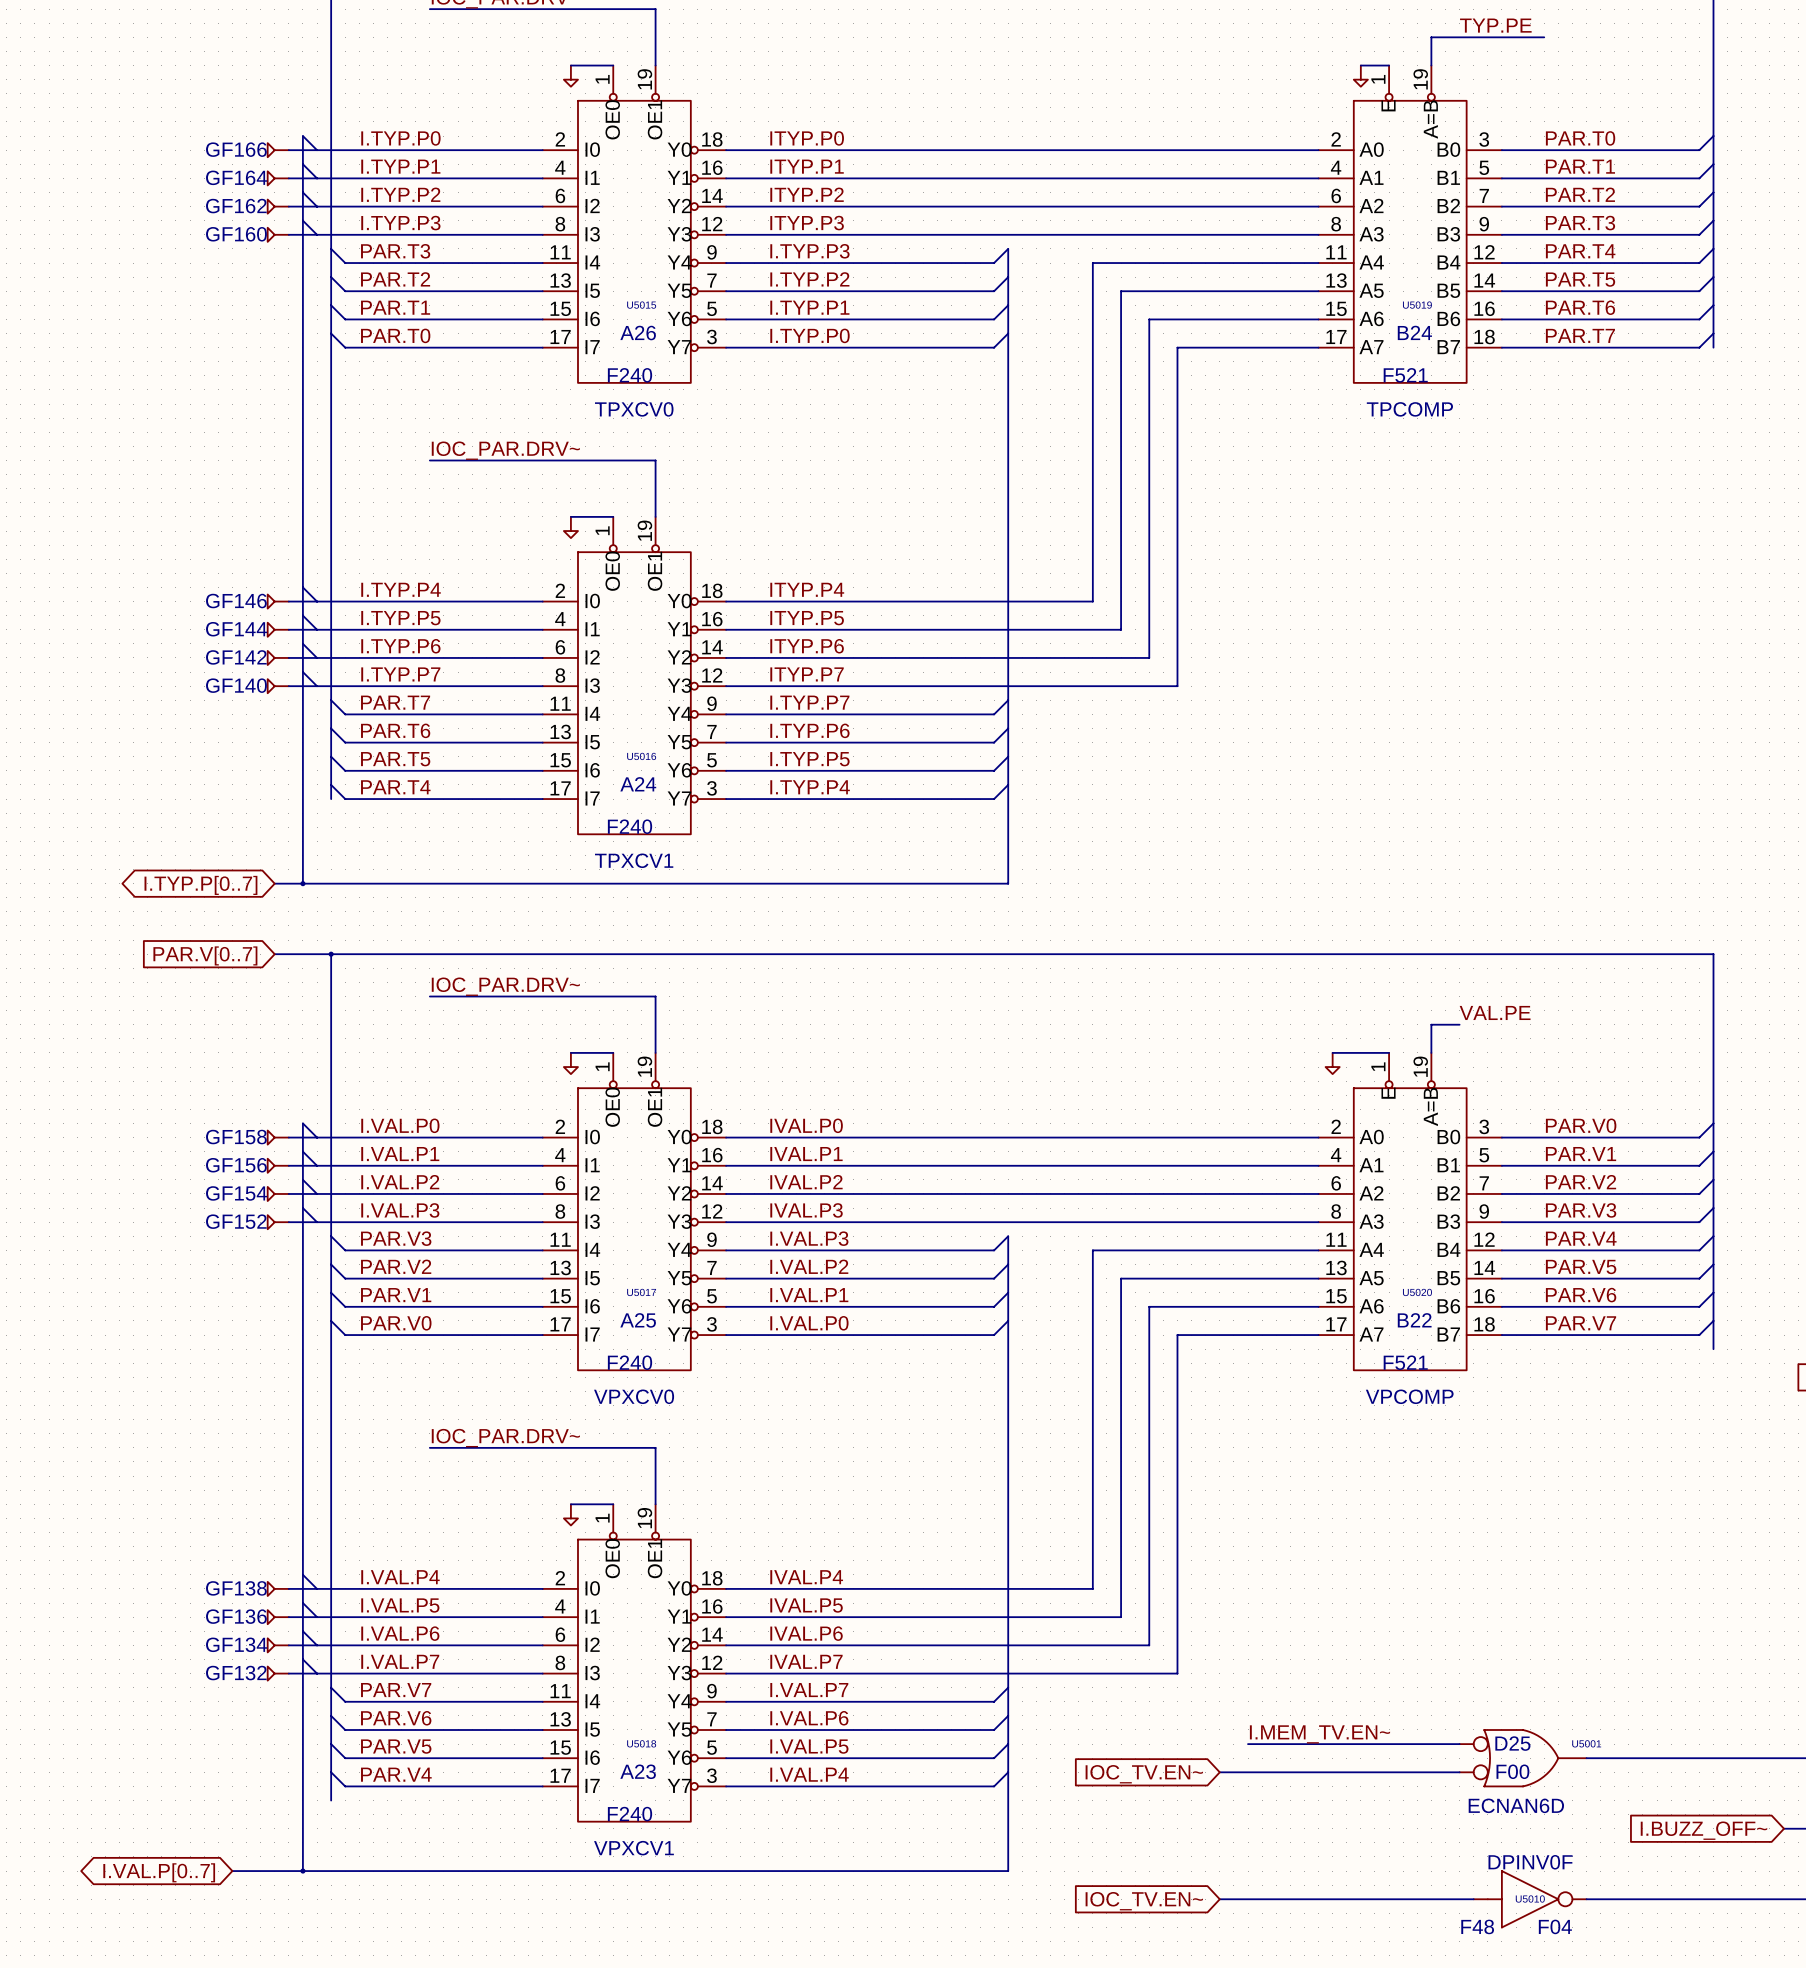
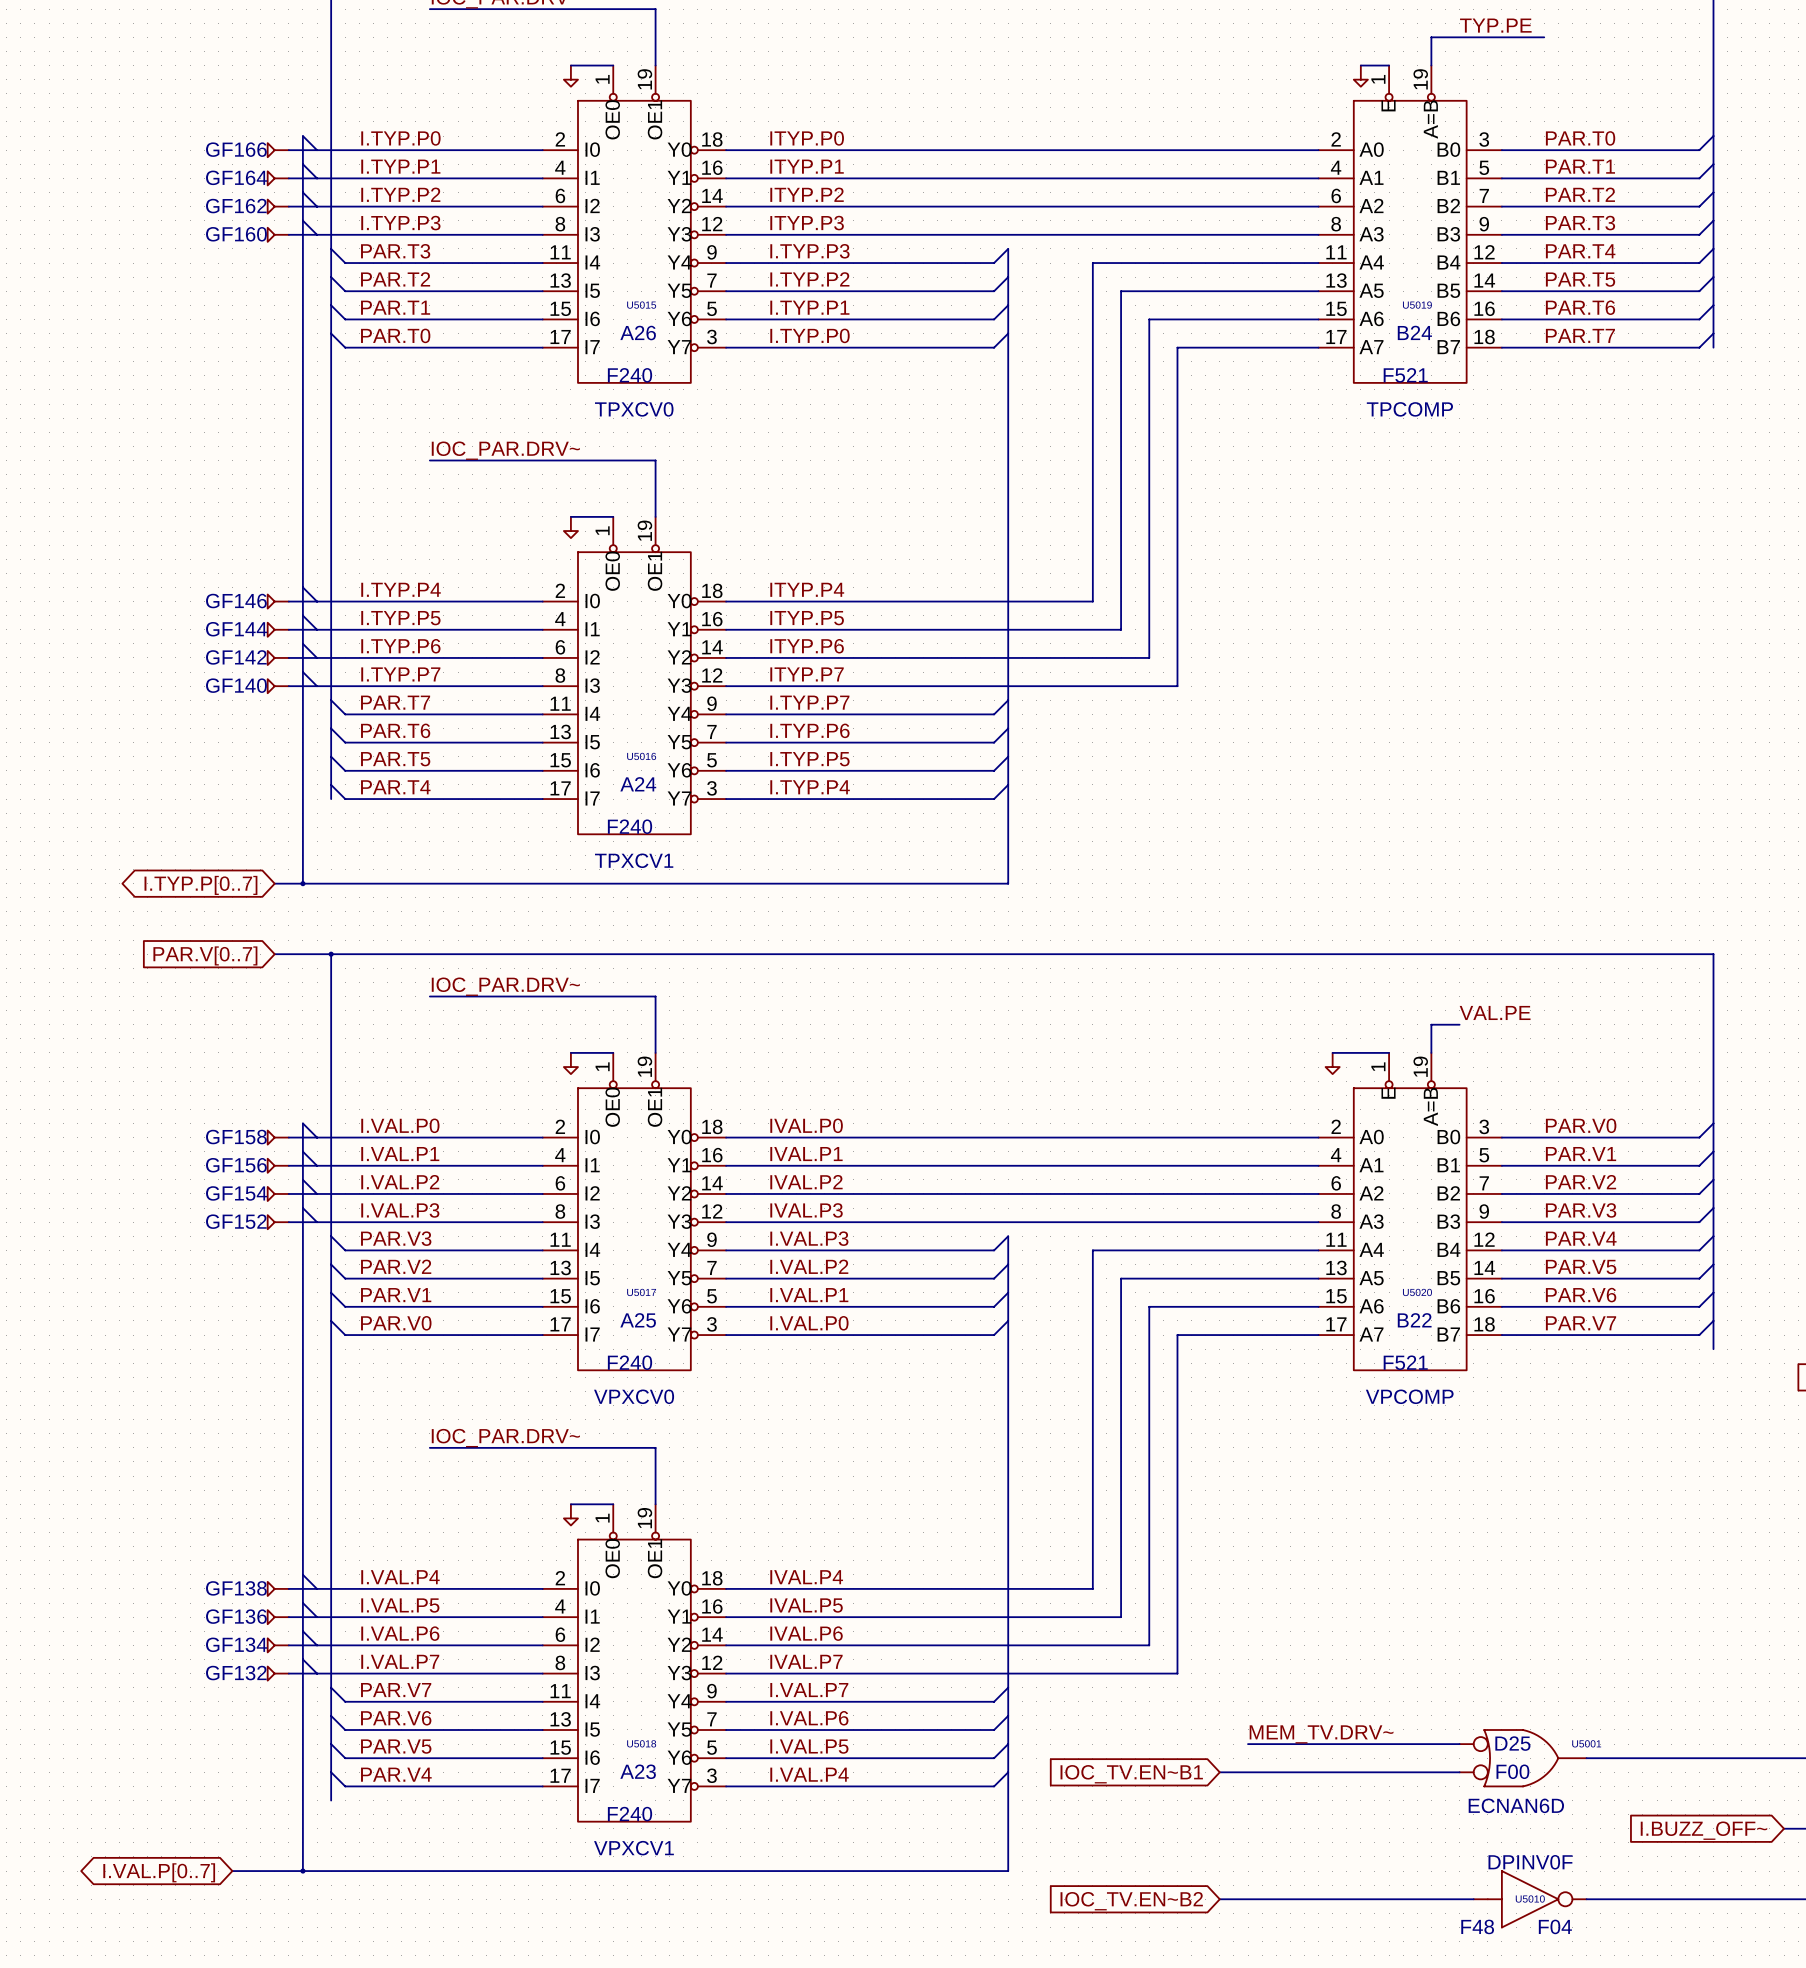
label: I.MEM_TV.EN~ (1319, 1734) -> MEM_TV.DRV~ (1321, 1734)
global label: IOC_TV.EN~ (1144, 1774) -> IOC_TV.EN~B1 (1131, 1774)
global label: IOC_TV.EN~ (1144, 1901) -> IOC_TV.EN~B2 (1131, 1901)

